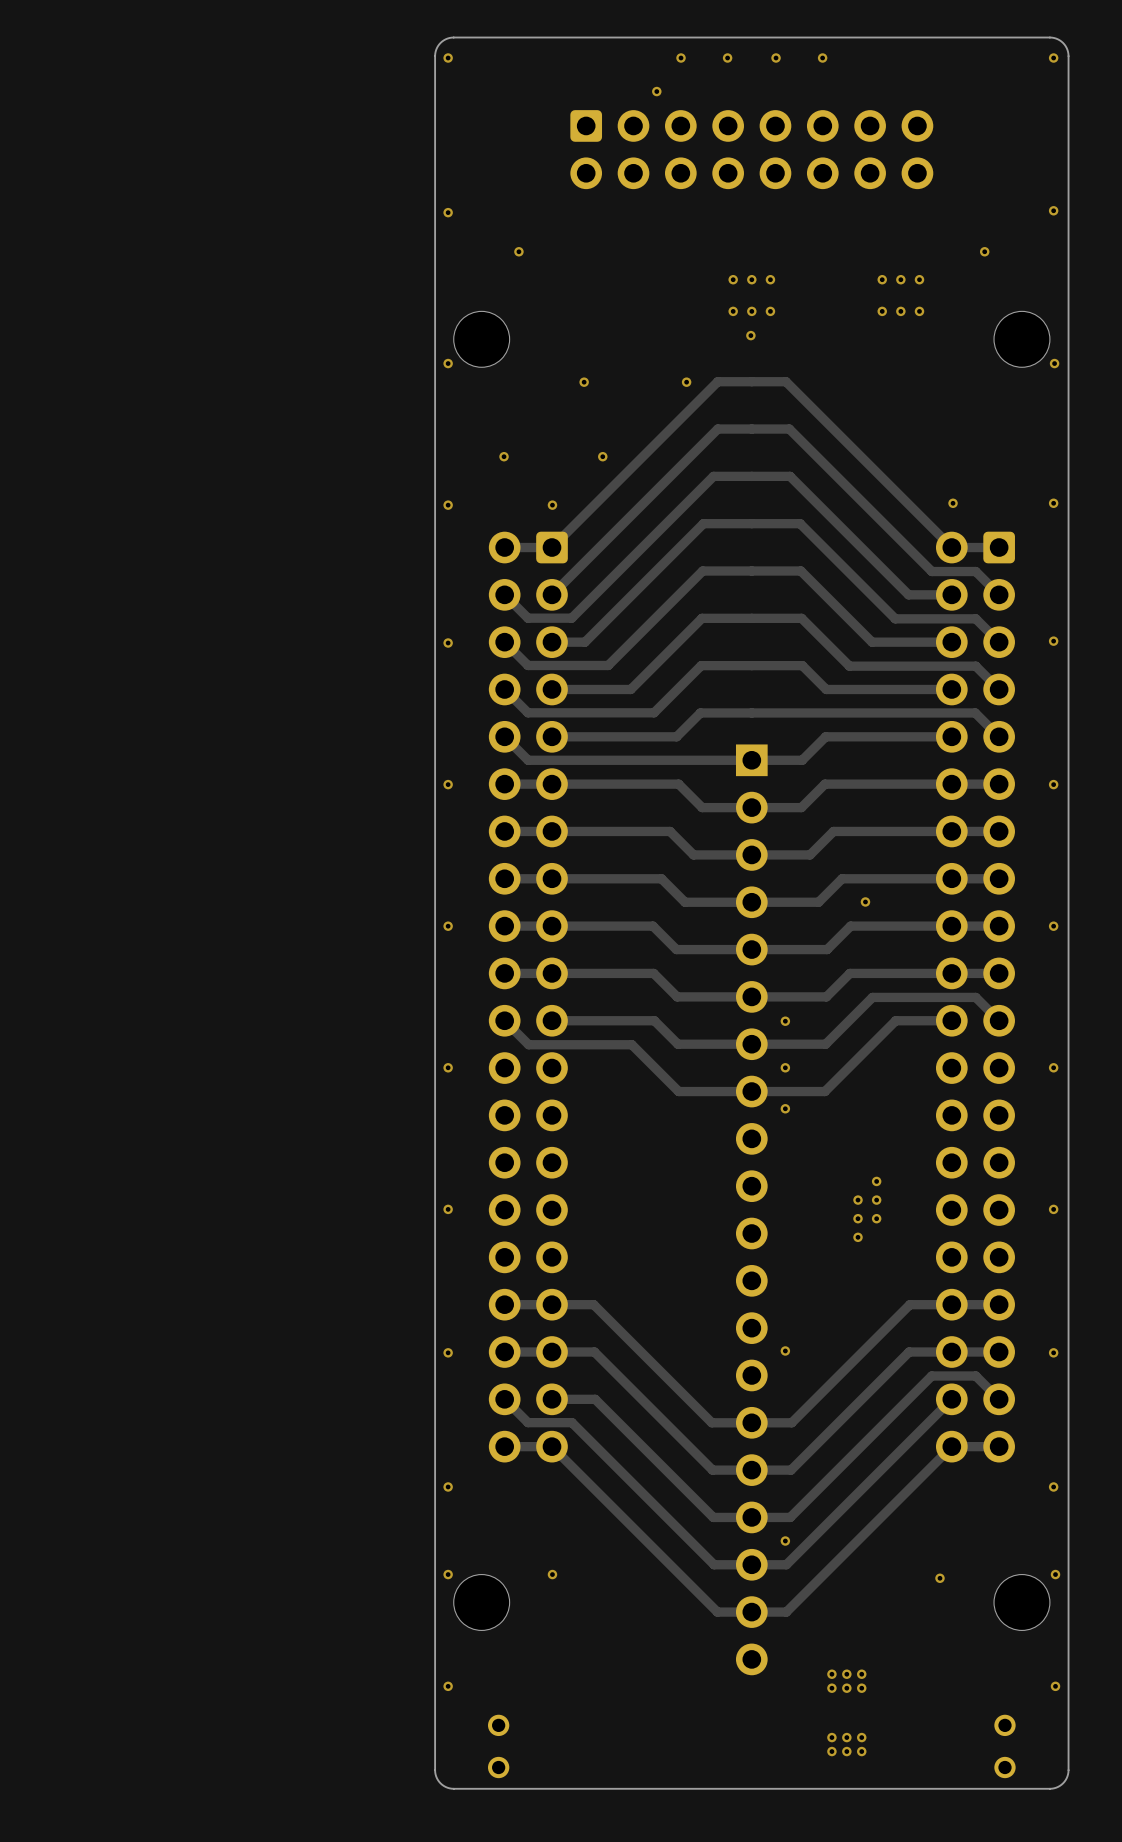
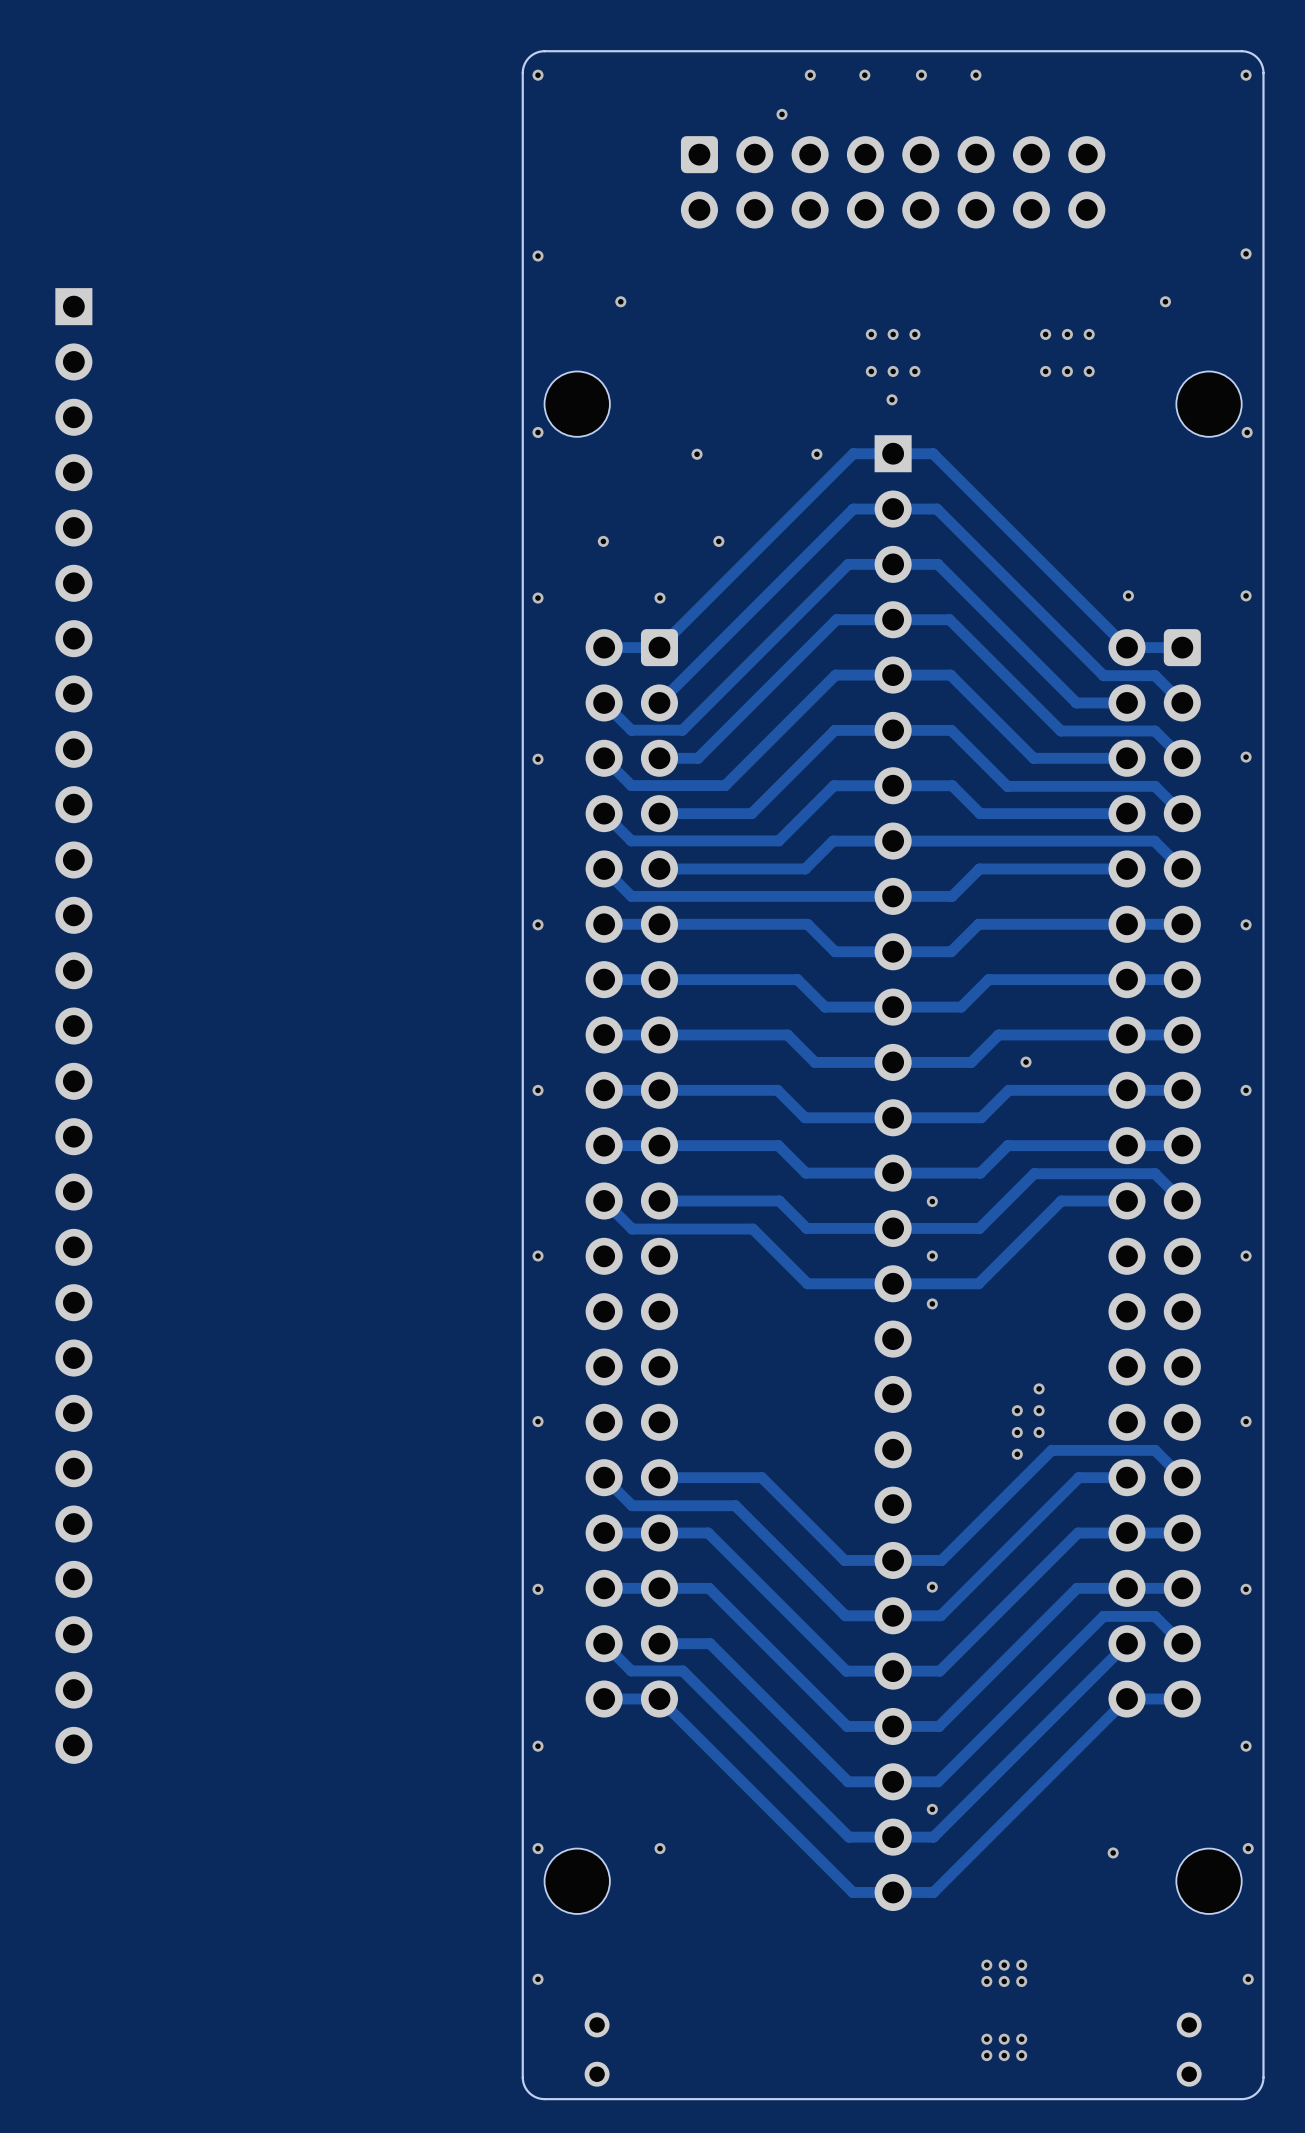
part: none -> (73, 1026)
part: none -> (893, 1173)
part: (751, 1209) -> none
track: none -> (1127, 1477) (1078, 1477) (940, 1615) (845, 1615) (735, 1505) (632, 1505) (604, 1477)
track: none -> (1182, 1477) (1155, 1450) (1051, 1450) (941, 1560) (844, 1560) (761, 1477) (659, 1477)

